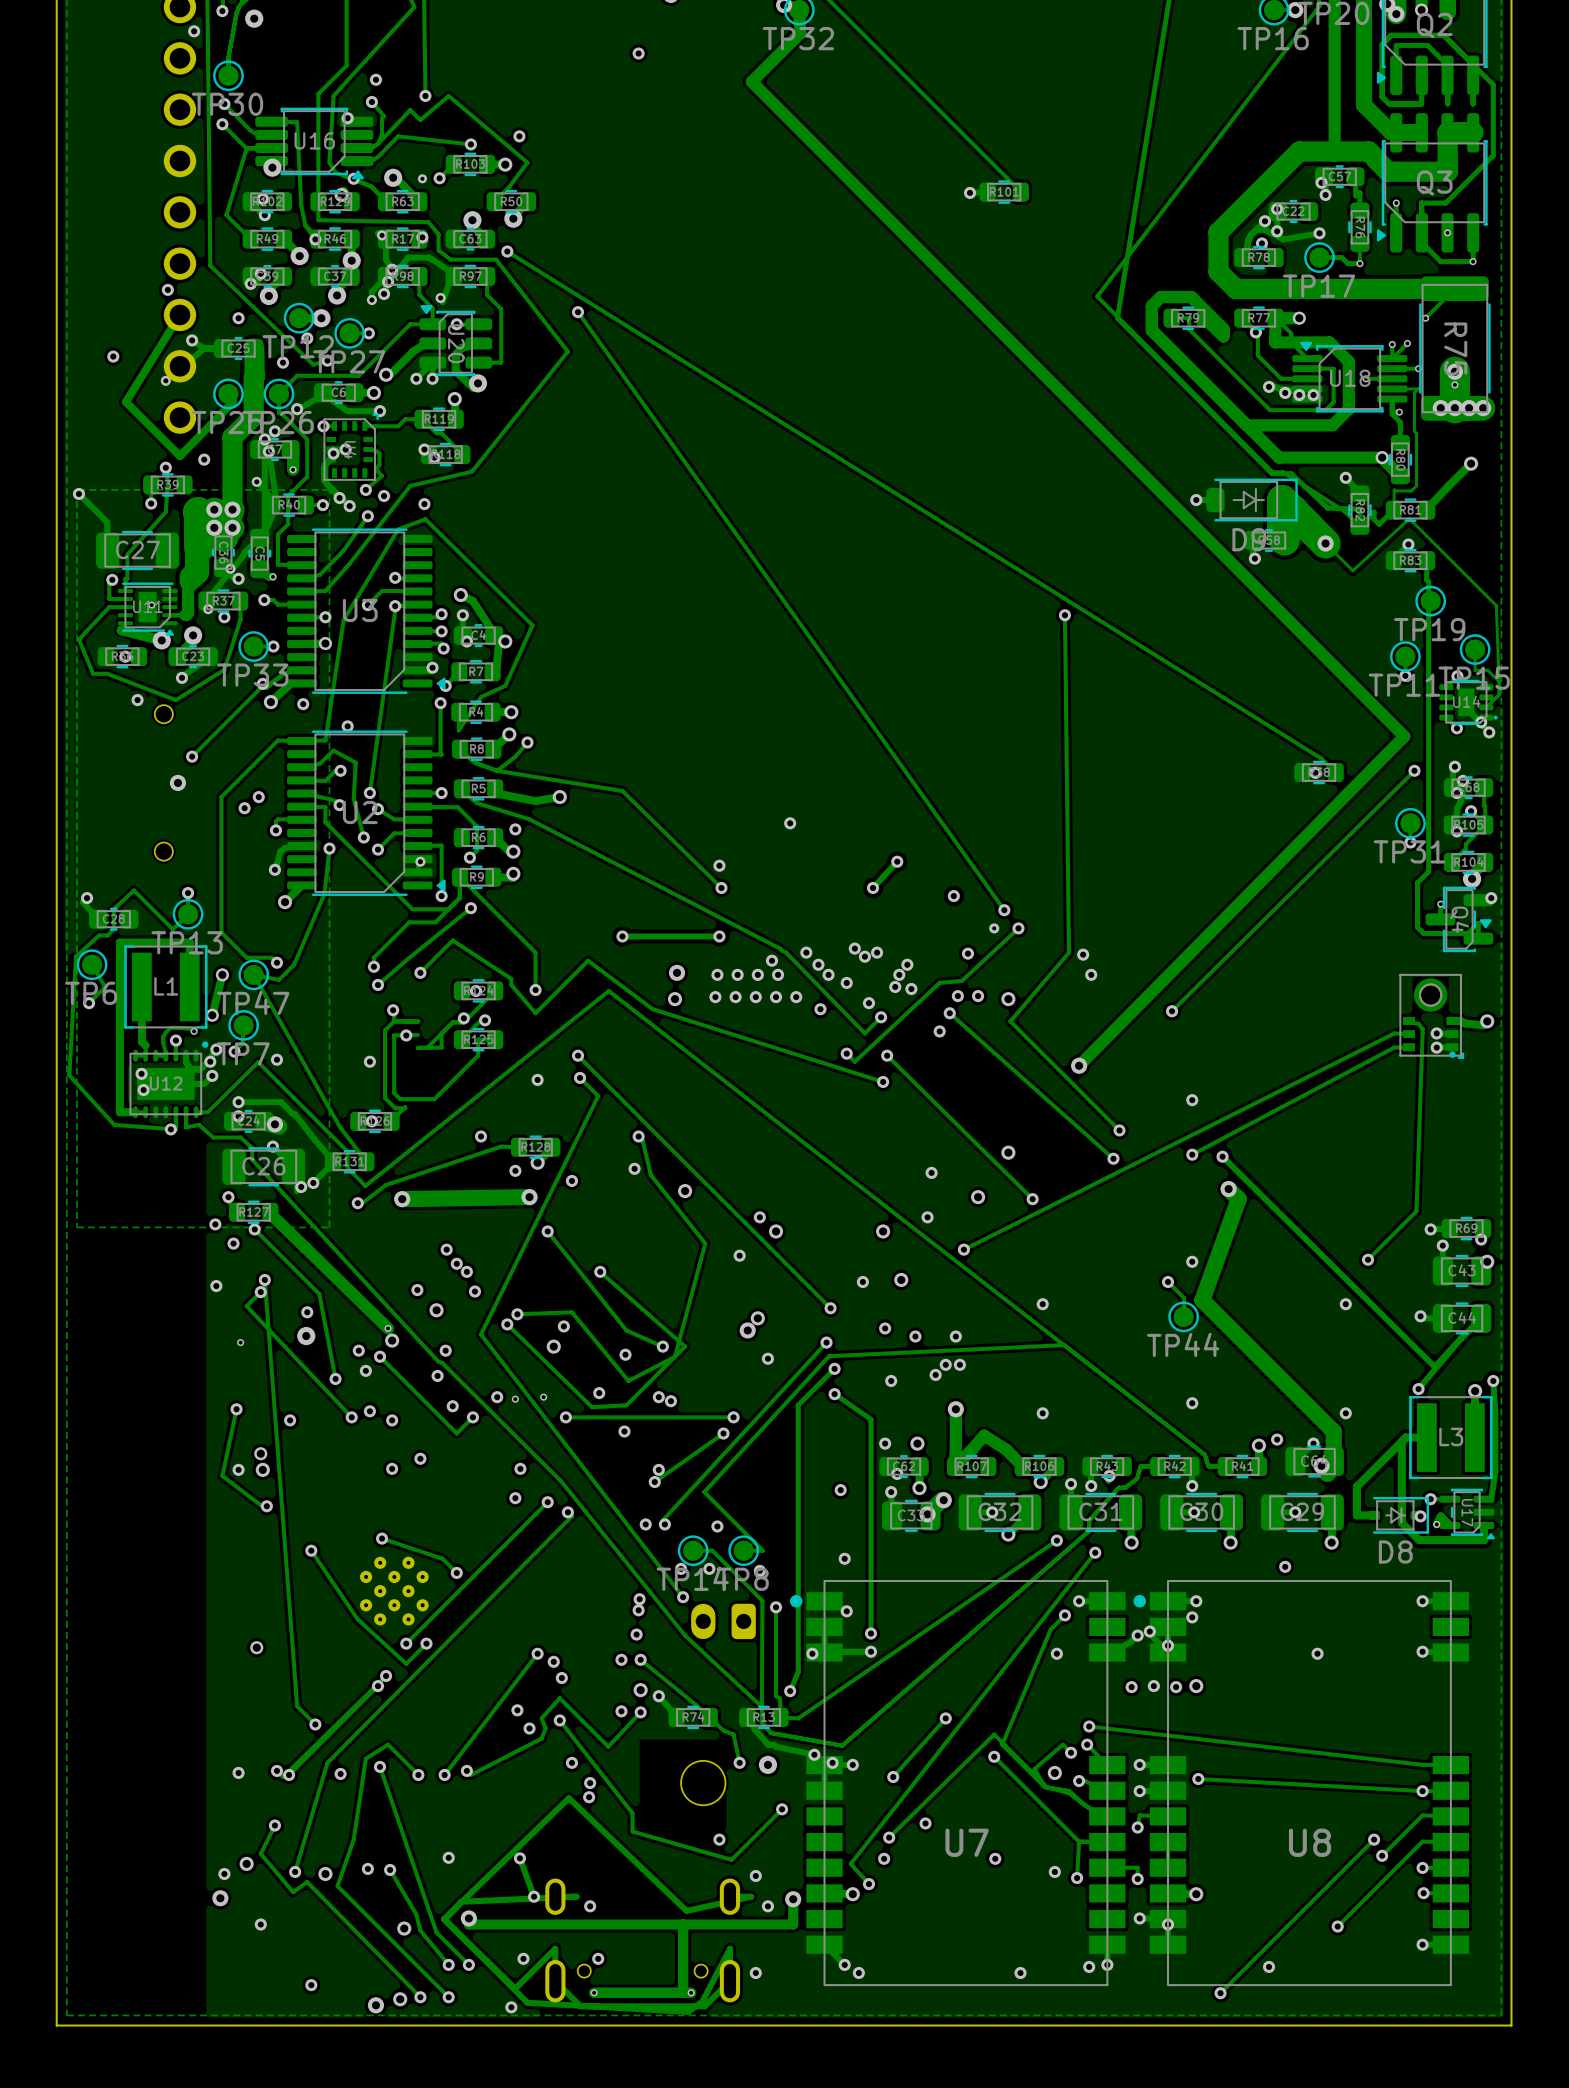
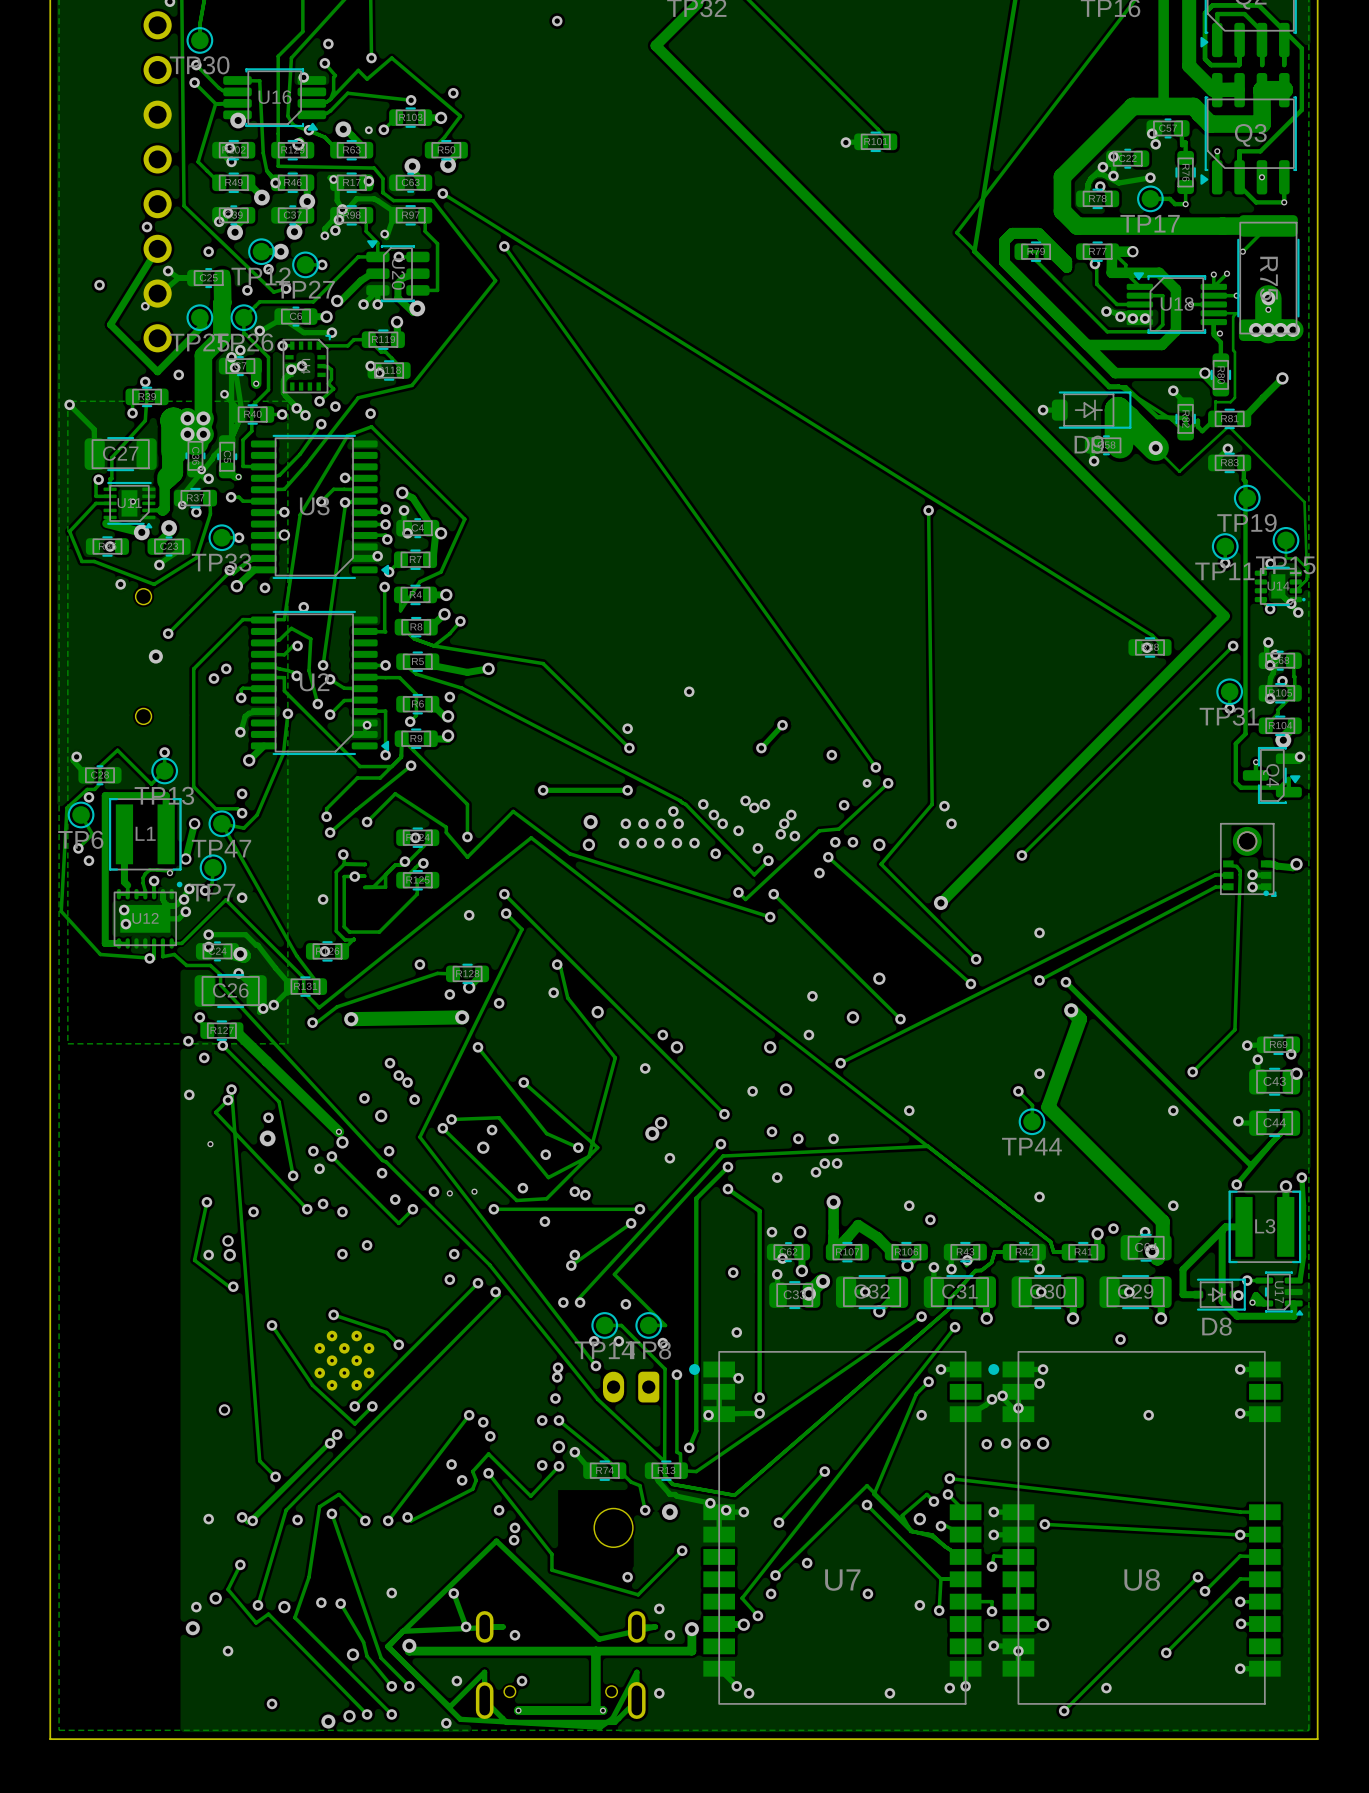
via: none -> (242, 793)
via: none -> (88, 797)
via: none -> (88, 860)
via: none -> (930, 1219)

